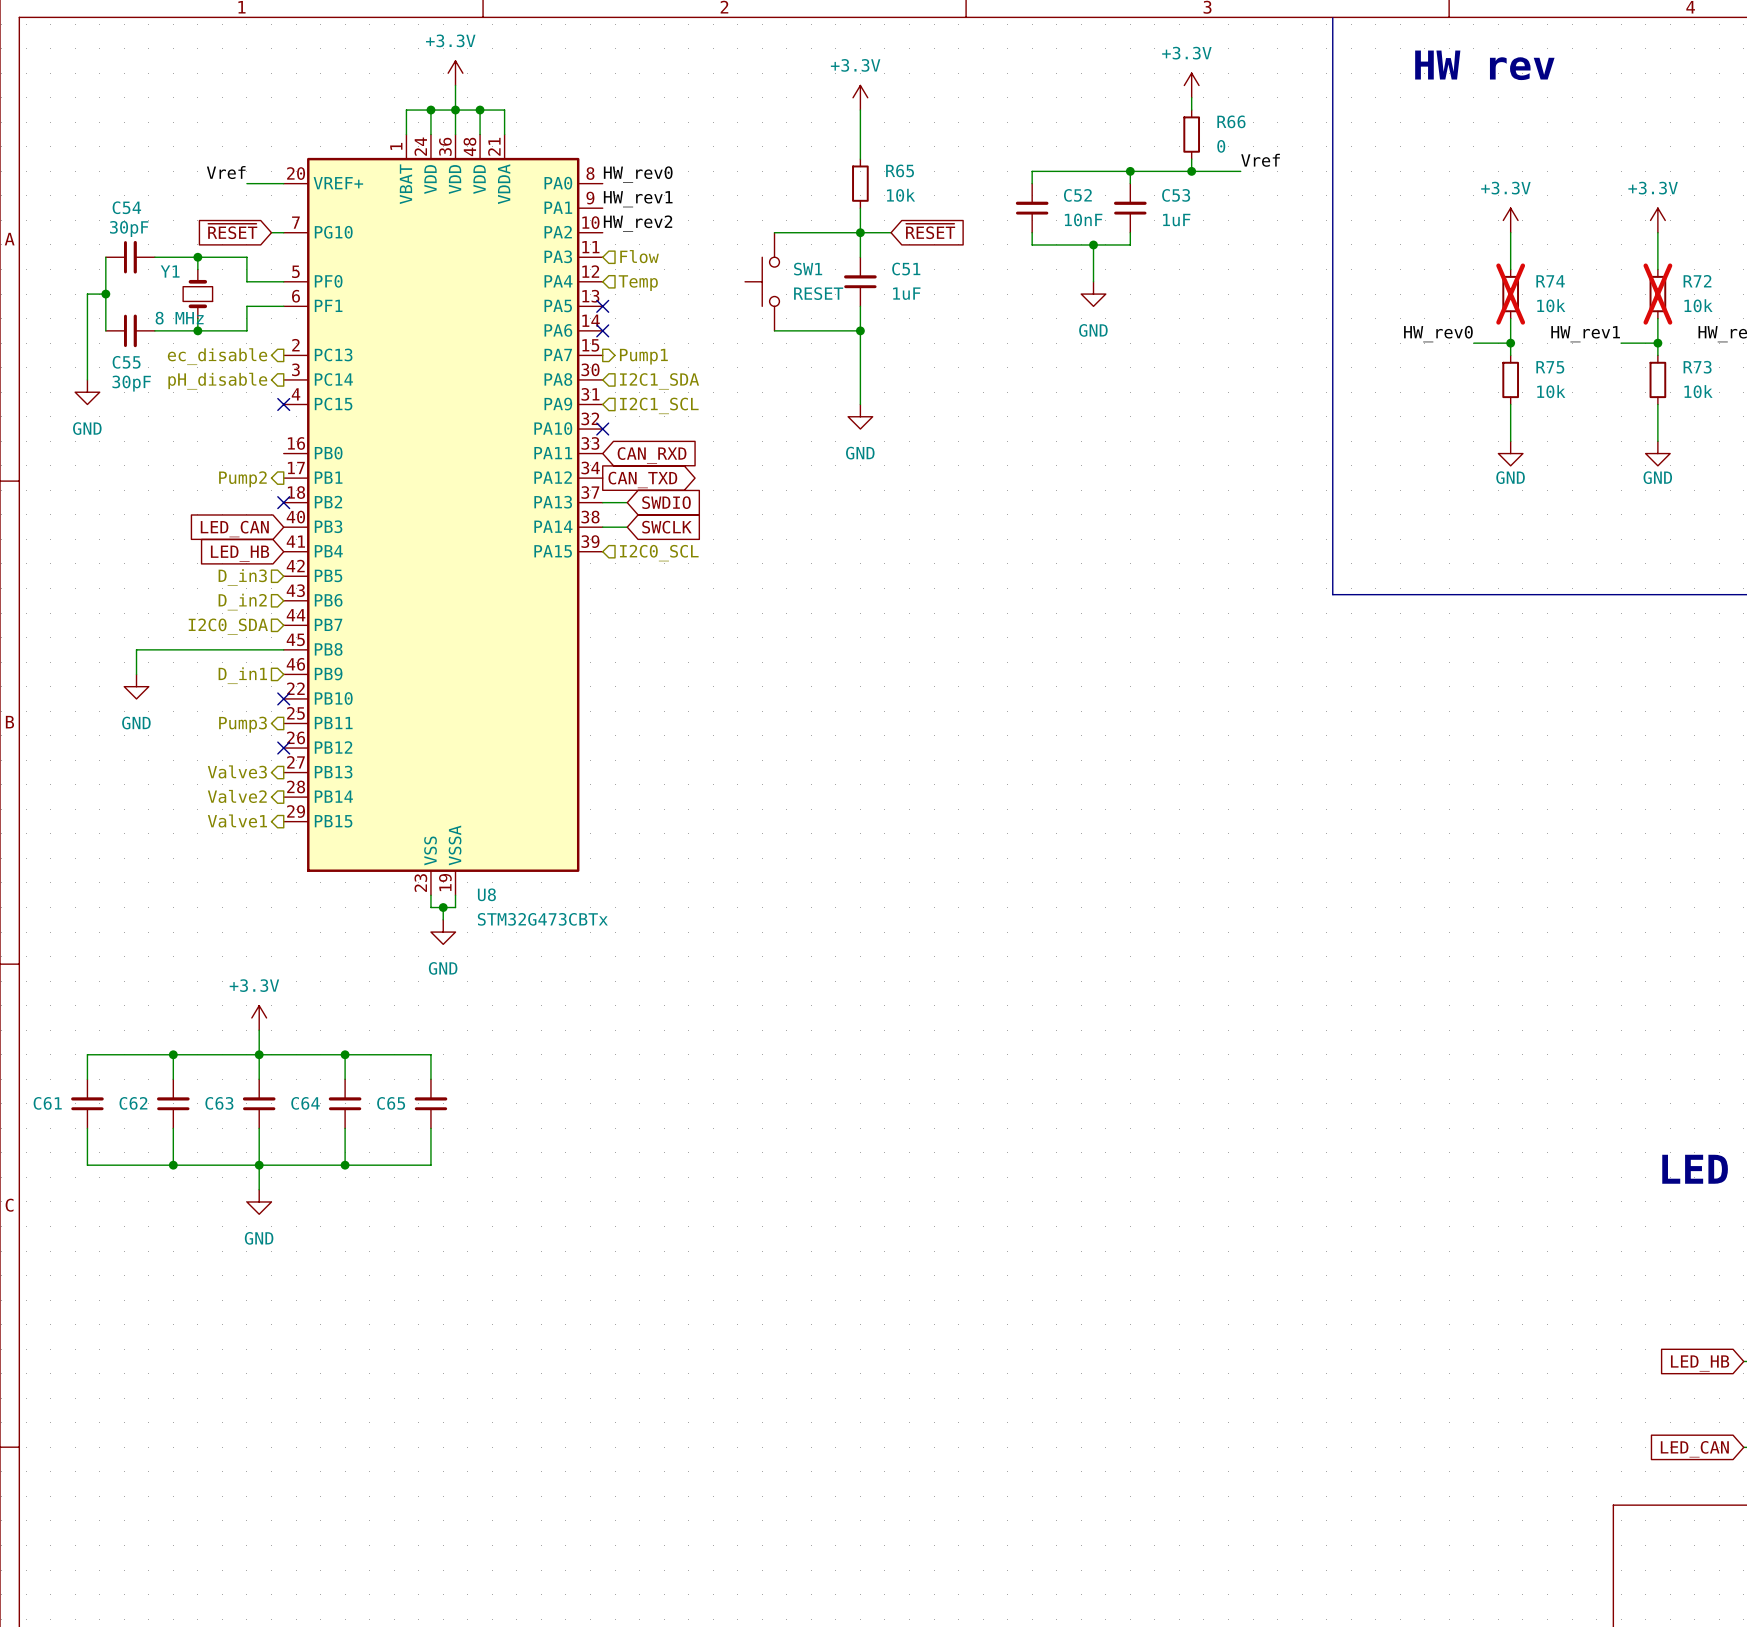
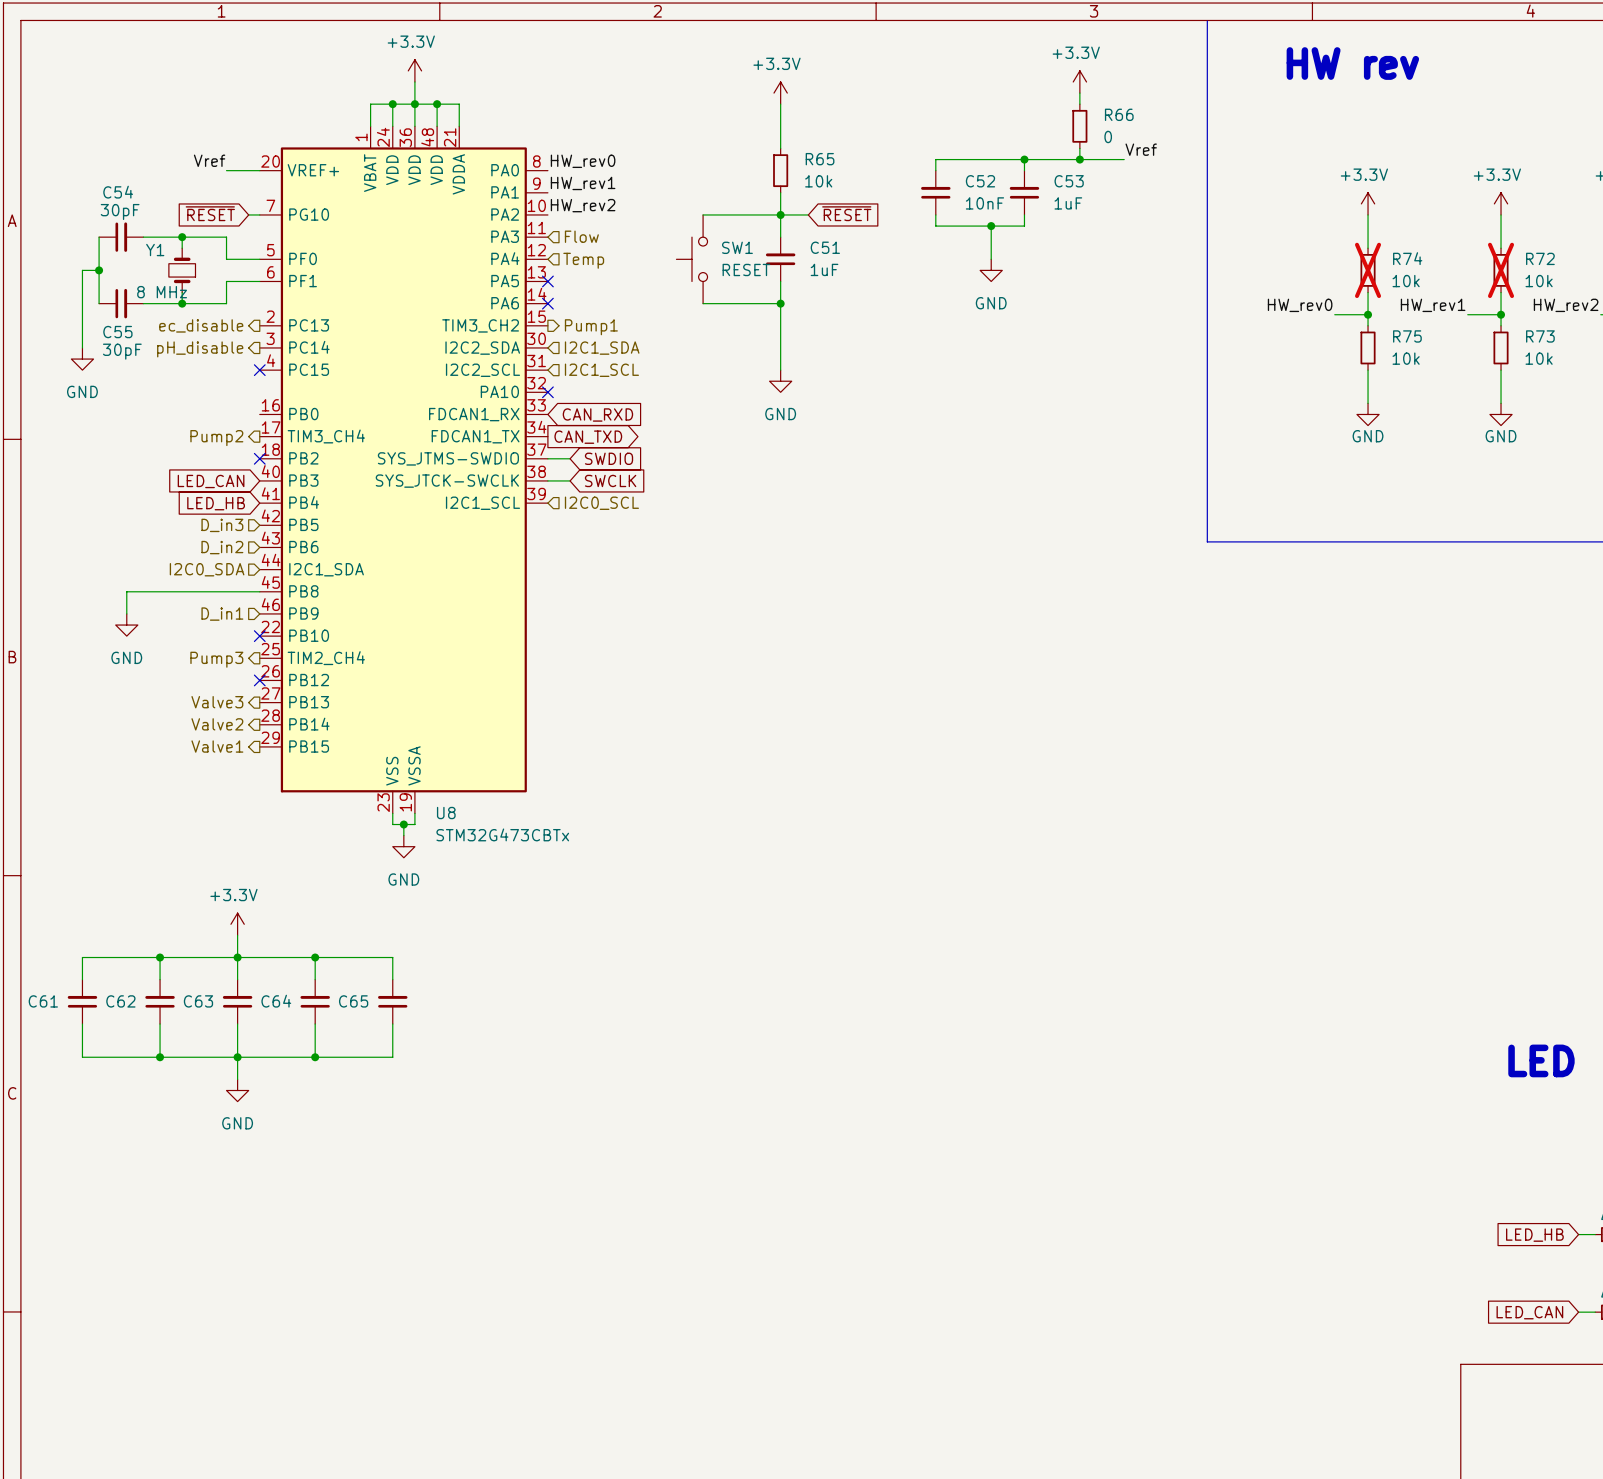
U8 symbol: [283, 134, 603, 896] -> [259, 126, 548, 814]

